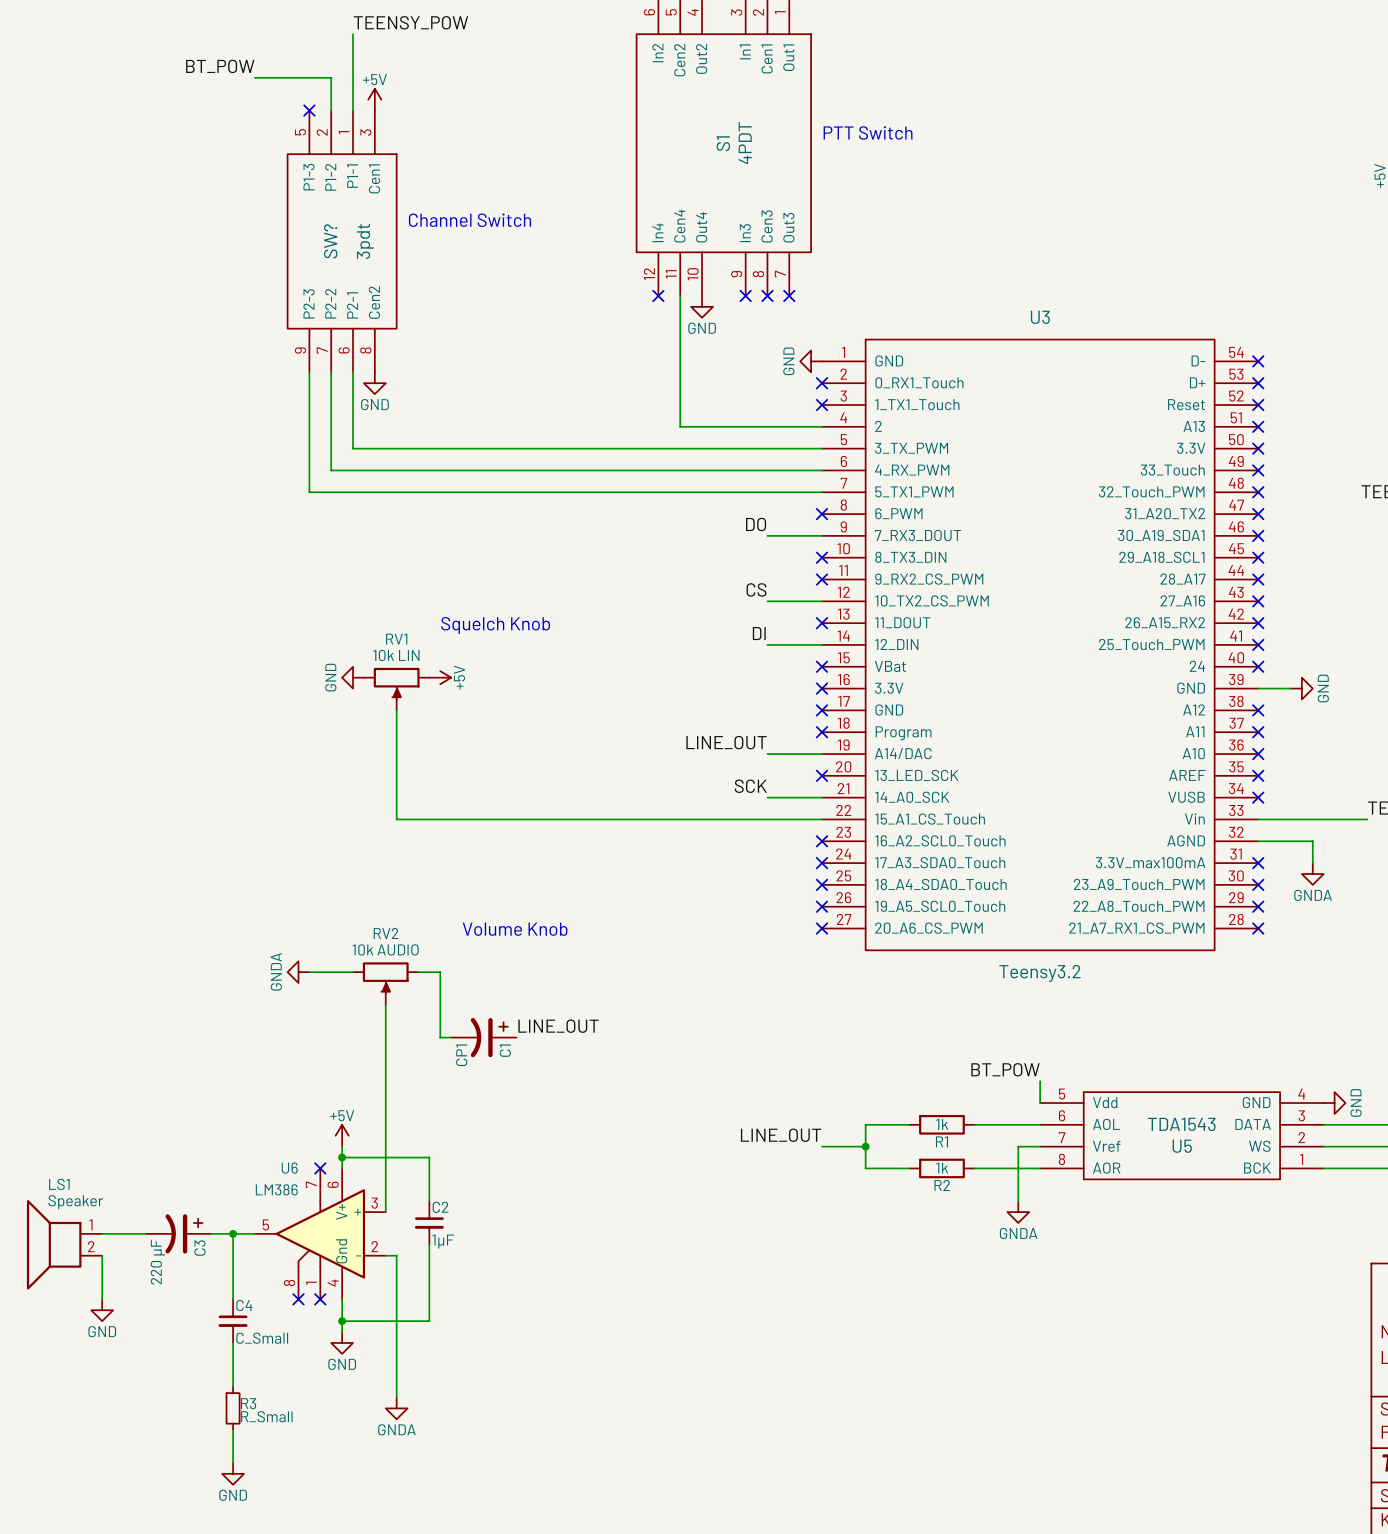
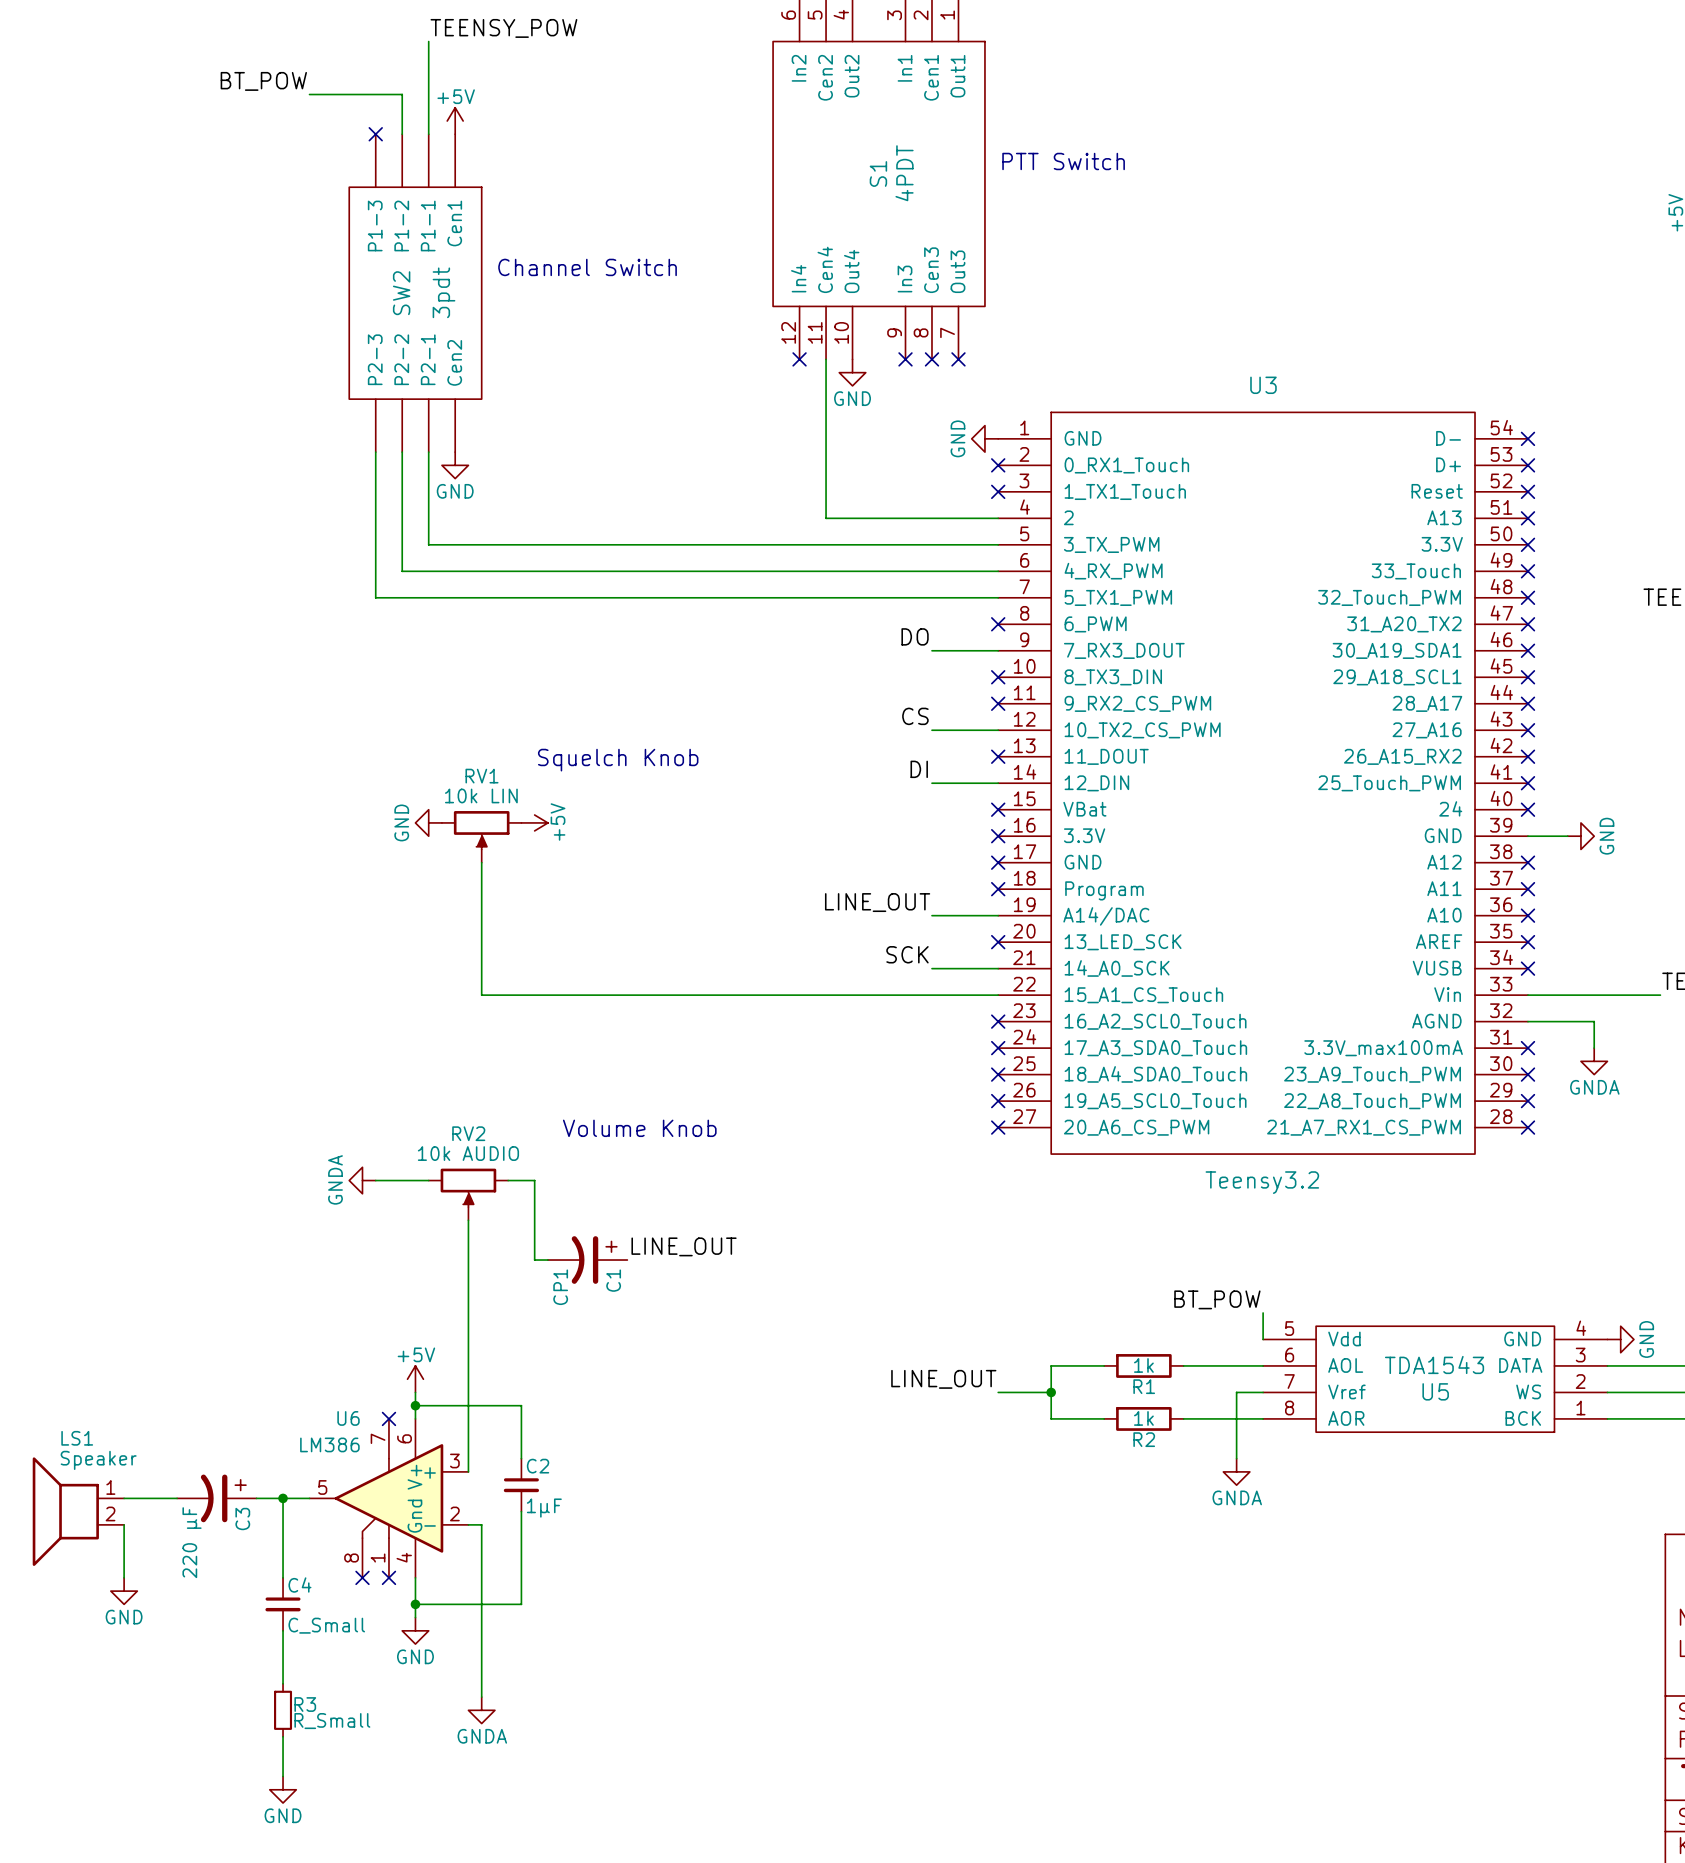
SW? pin number: 5 (300, 132) -> none
SW? pin number: 2 (322, 132) -> none
SW? pin number: 1 (344, 132) -> none
SW? pin number: 3 (365, 132) -> none
SW? name: SW? (330, 241) -> SW2 (401, 293)
SW? pin number: 9 (300, 350) -> none
SW? pin number: 7 (322, 350) -> none
SW? pin number: 6 (344, 350) -> none
SW? pin number: 8 (365, 350) -> none

